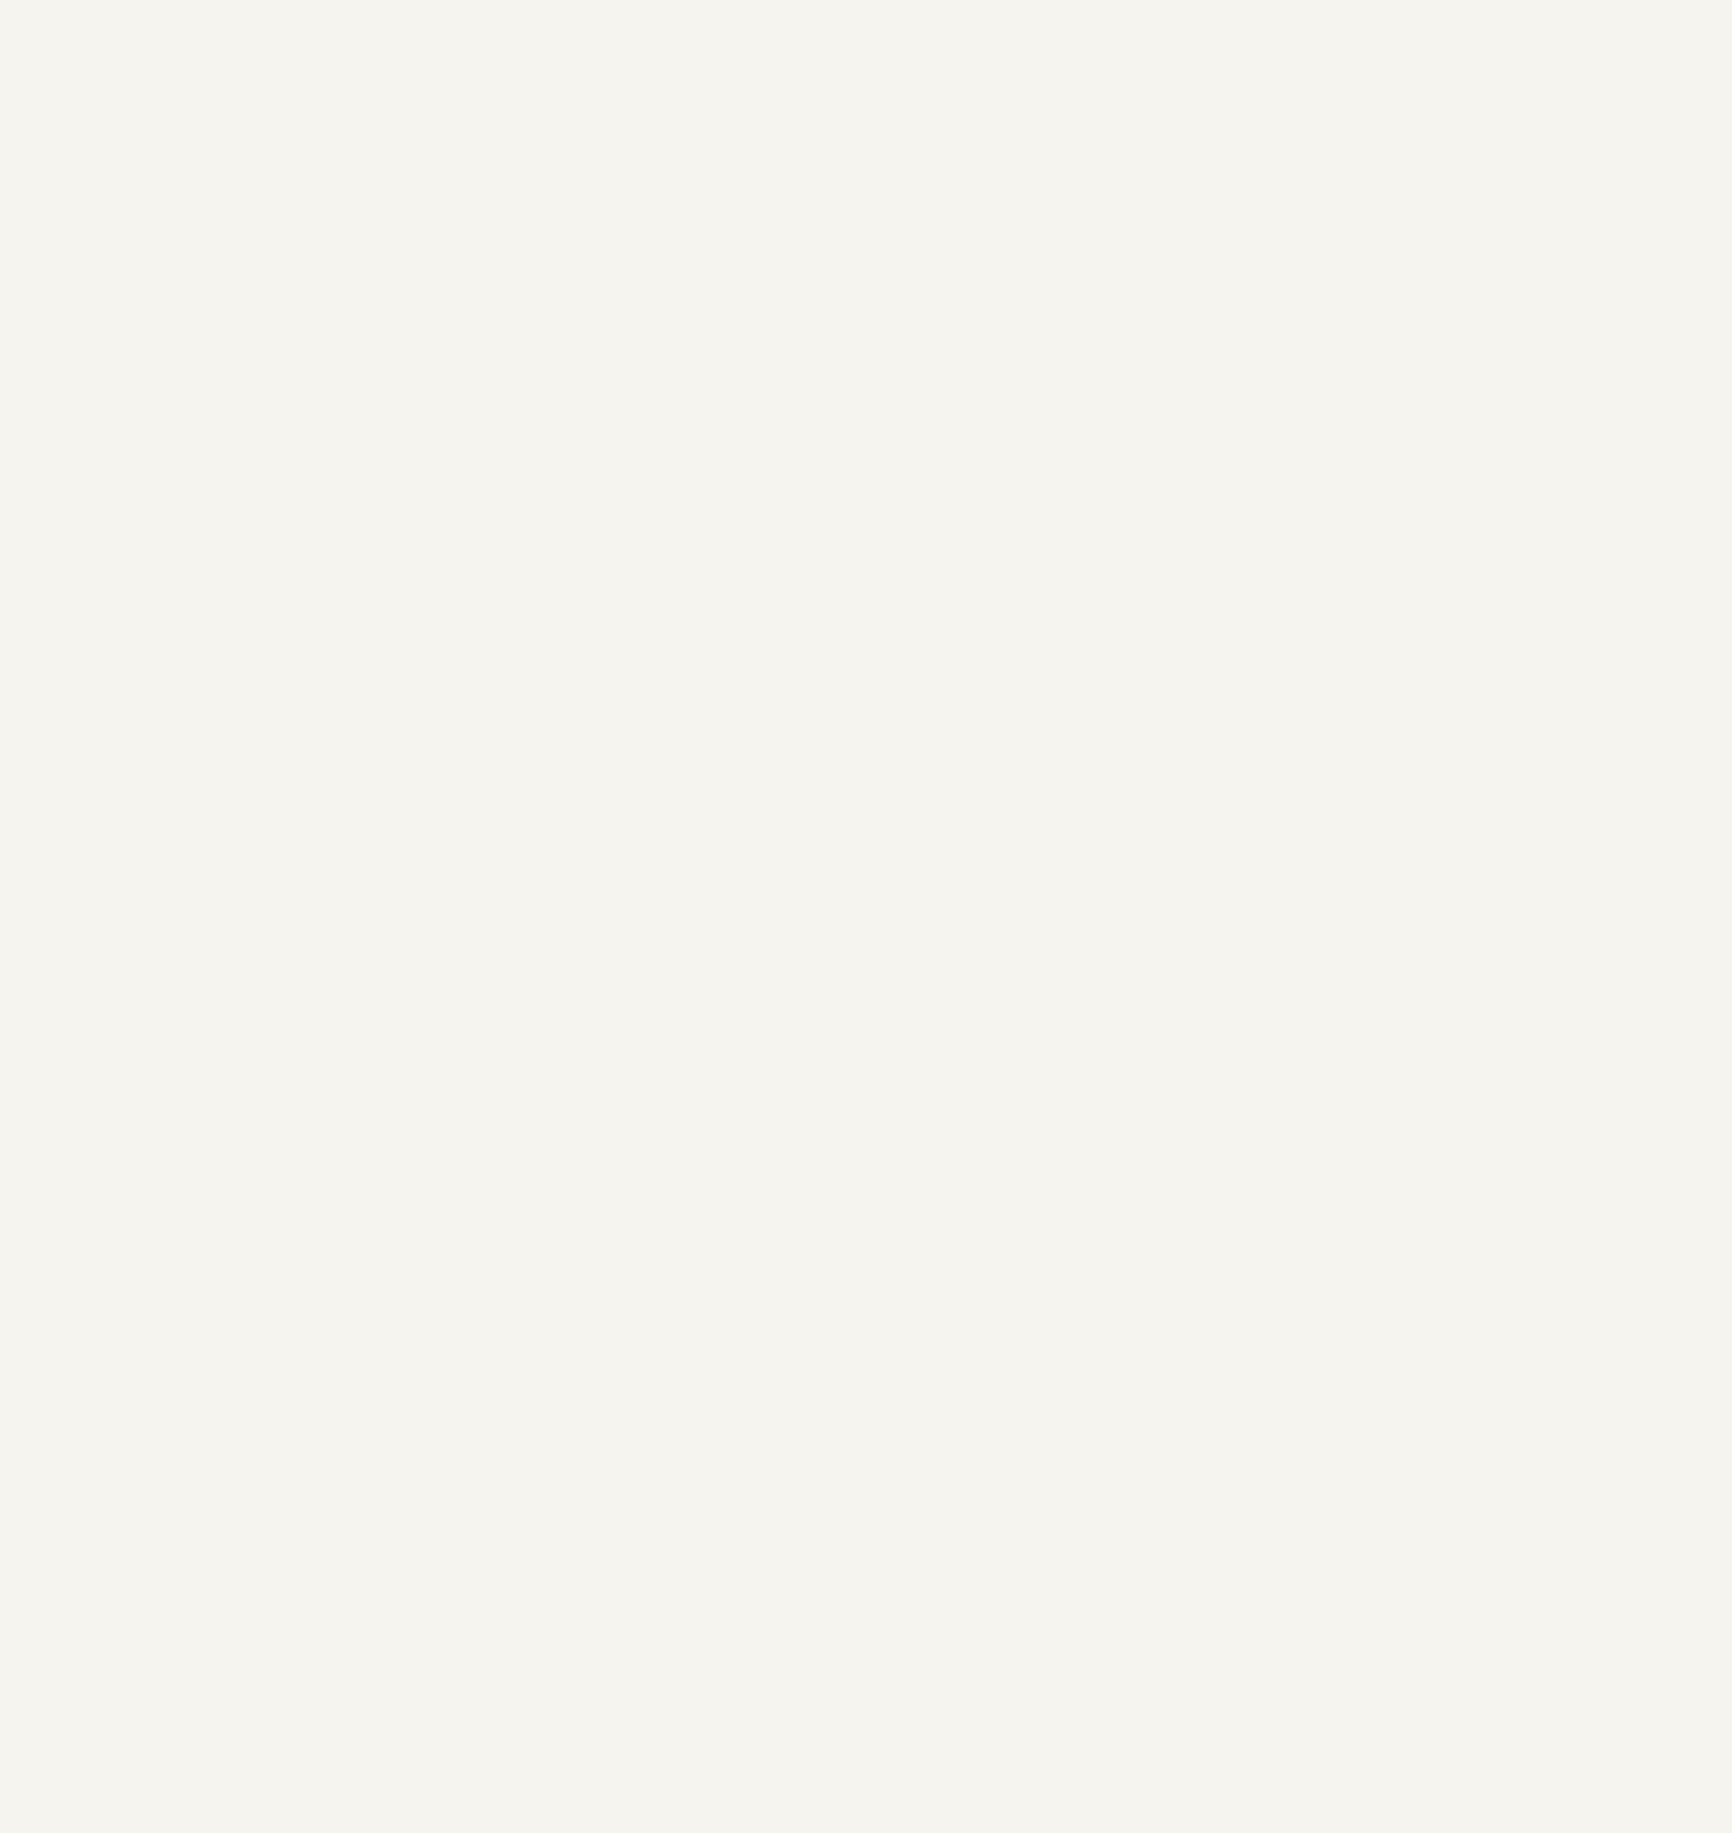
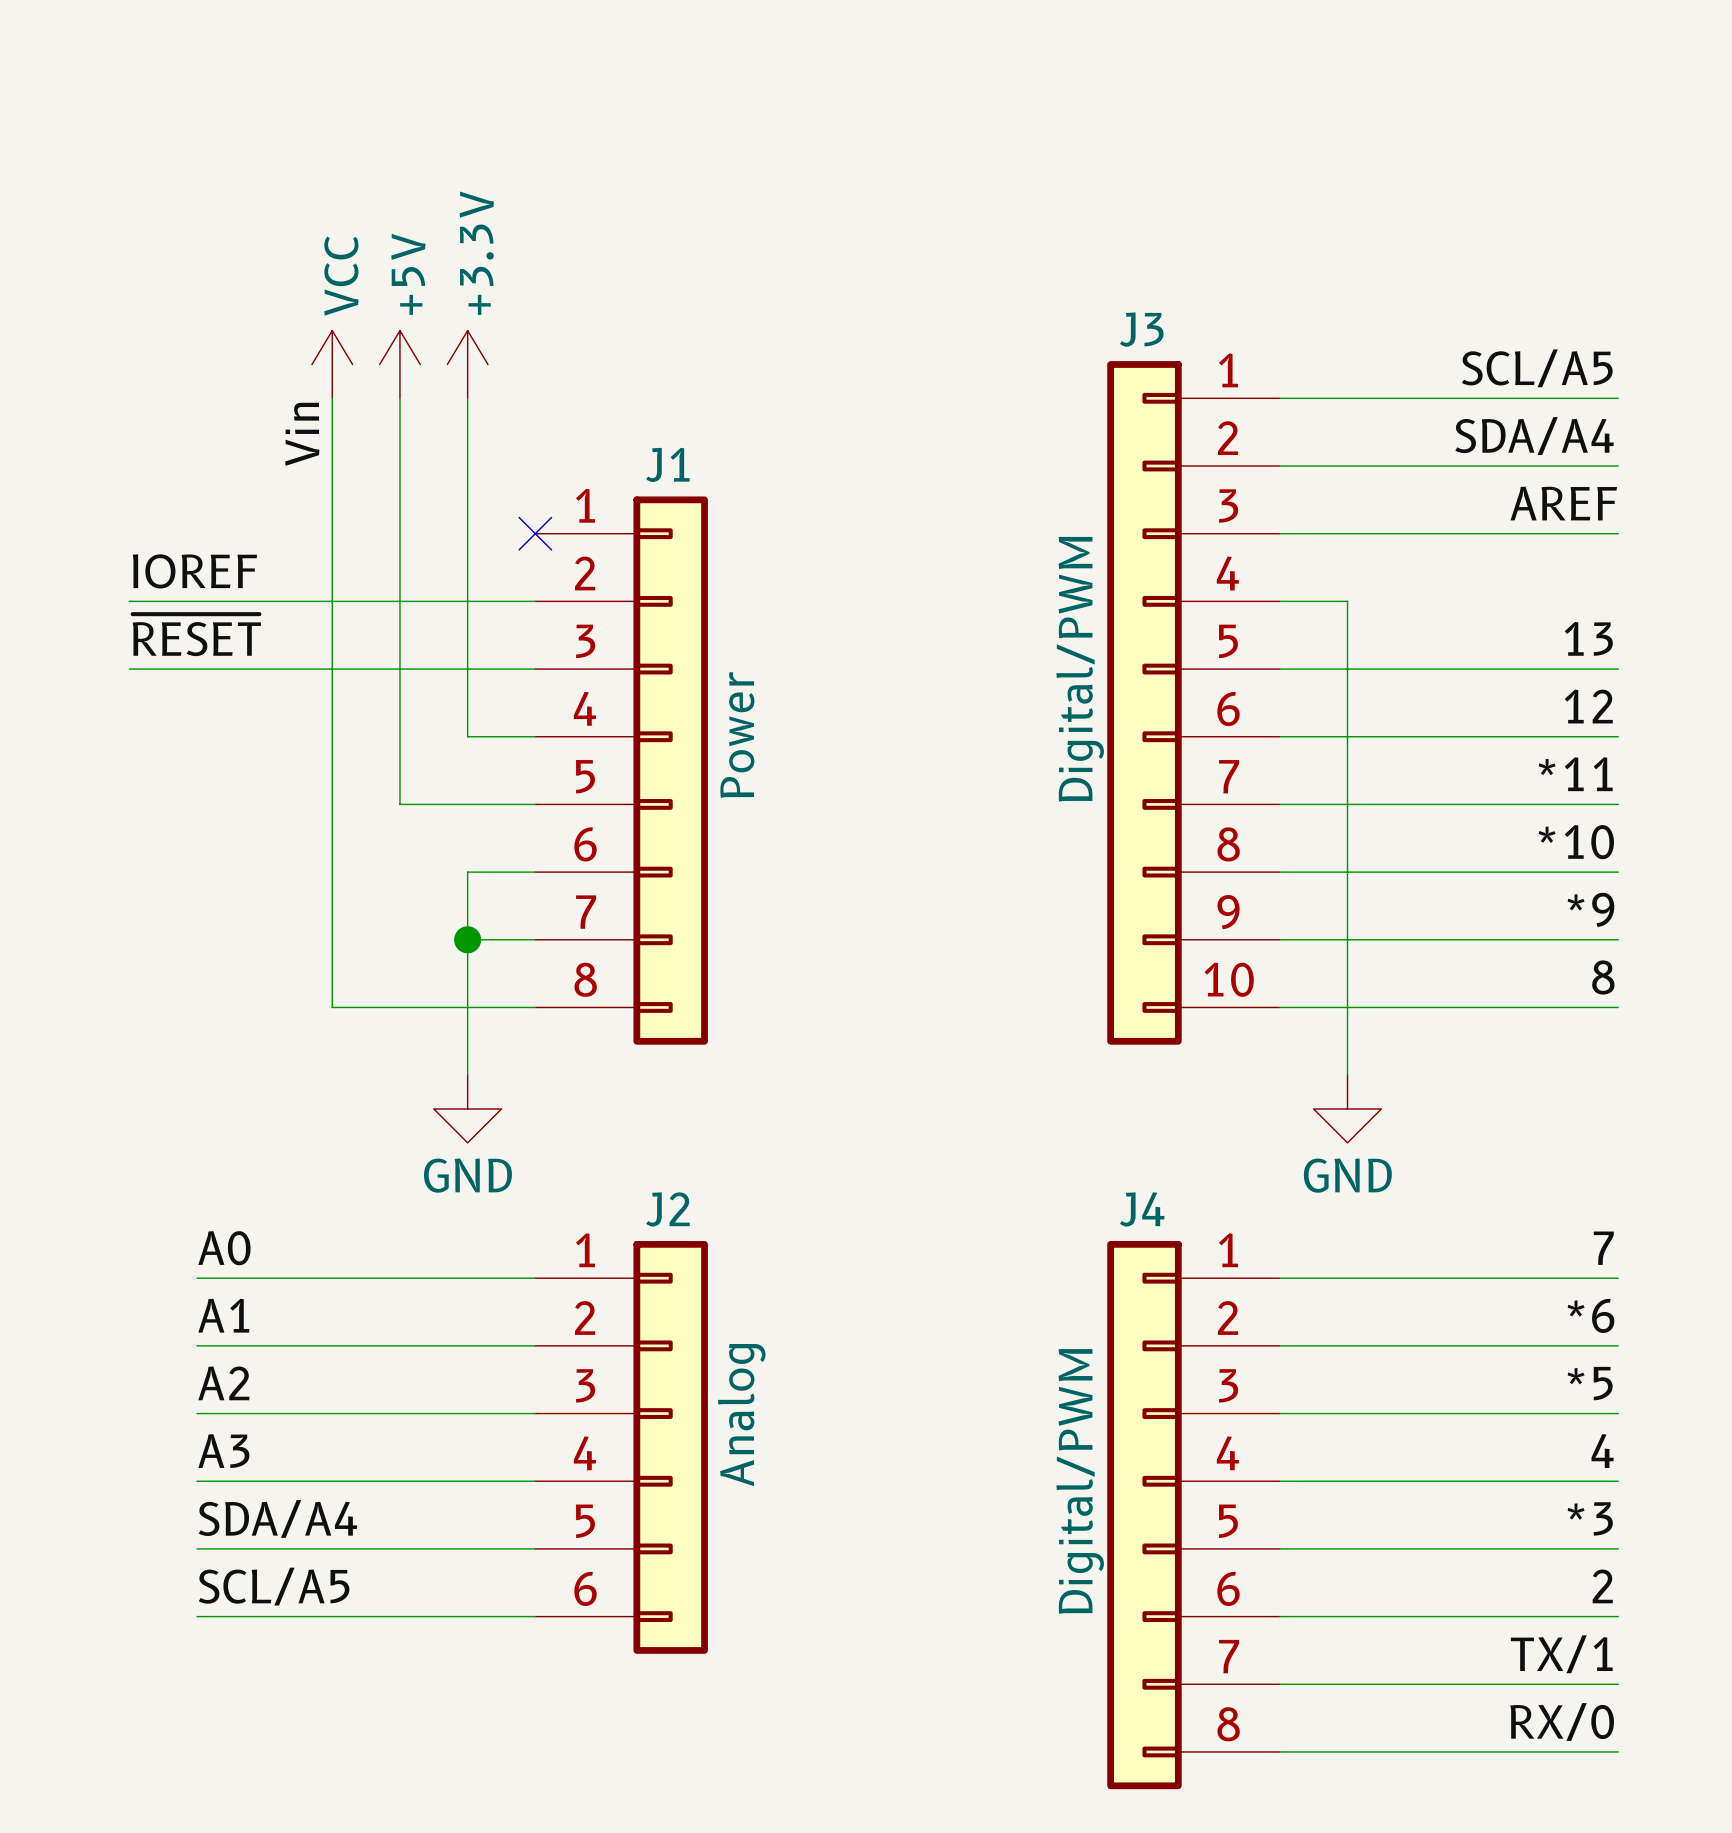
power symbol: none -> VCC (332, 364)
power symbol: none -> +5V (399, 364)
power symbol: none -> +3.3V (467, 364)
label: none -> SCL/A5 (1537, 368)
wire: none -> (332, 398) (332, 1007) (535, 1007)
wire: none -> (399, 398) (399, 804) (535, 804)
wire: none -> (467, 398) (467, 736) (535, 736)
wire: none -> (1279, 398) (1618, 398)
label: none -> Vin (302, 434)
label: none -> SDA/A4 (1534, 436)
wire: none -> (1279, 466) (1618, 466)
label: none -> AREF (1563, 503)
no-connect mark: none -> (535, 533)
wire: none -> (1279, 533) (1618, 533)
label: none -> IOREF (194, 571)
wire: none -> (129, 601) (535, 601)
wire: none -> (1279, 601) (1347, 601) (1347, 1075)
label: none -> ~{RESET} (196, 635)
label: none -> 13 (1588, 638)
wire: none -> (129, 669) (535, 669)
wire: none -> (1279, 669) (1618, 669)
J3: none -> Digital/PWM (1193, 702)
label: none -> 12 (1588, 706)
wire: none -> (1279, 736) (1618, 736)
J1: none -> Power (621, 770)
label: none -> *11 (1575, 774)
wire: none -> (1279, 804) (1618, 804)
label: none -> *10 (1576, 842)
wire: none -> (535, 872) (467, 872) (467, 1075)
wire: none -> (1279, 872) (1618, 872)
label: none -> *9 (1590, 909)
wire: none -> (467, 939) (535, 939)
junction: none -> (467, 939)
wire: none -> (1279, 939) (1618, 939)
label: none -> 8 (1603, 977)
wire: none -> (1279, 1007) (1618, 1007)
power symbol: none -> GND (467, 1108)
power symbol: none -> GND (1347, 1108)
label: none -> A0 (224, 1248)
label: none -> 7 (1603, 1248)
wire: none -> (196, 1278) (535, 1278)
wire: none -> (1279, 1278) (1618, 1278)
label: none -> A1 (223, 1315)
label: none -> *6 (1591, 1315)
wire: none -> (196, 1345) (535, 1345)
wire: none -> (1279, 1345) (1618, 1345)
label: none -> A2 (223, 1383)
label: none -> *5 (1590, 1383)
wire: none -> (196, 1413) (535, 1413)
wire: none -> (1279, 1413) (1618, 1413)
J2: none -> Analog (621, 1447)
label: none -> A3 (223, 1451)
label: none -> 4 (1602, 1451)
wire: none -> (196, 1481) (535, 1481)
wire: none -> (1279, 1481) (1618, 1481)
J4: none -> Digital/PWM (1193, 1515)
label: none -> SDA/A4 (277, 1518)
label: none -> *3 (1590, 1518)
wire: none -> (196, 1548) (535, 1548)
wire: none -> (1279, 1548) (1618, 1548)
label: none -> SCL/A5 (274, 1586)
label: none -> 2 (1602, 1586)
wire: none -> (196, 1616) (535, 1616)
wire: none -> (1279, 1616) (1618, 1616)
label: none -> TX/1 (1561, 1654)
wire: none -> (1279, 1684) (1618, 1684)
label: none -> RX/0 (1562, 1721)
wire: none -> (1279, 1751) (1618, 1751)

